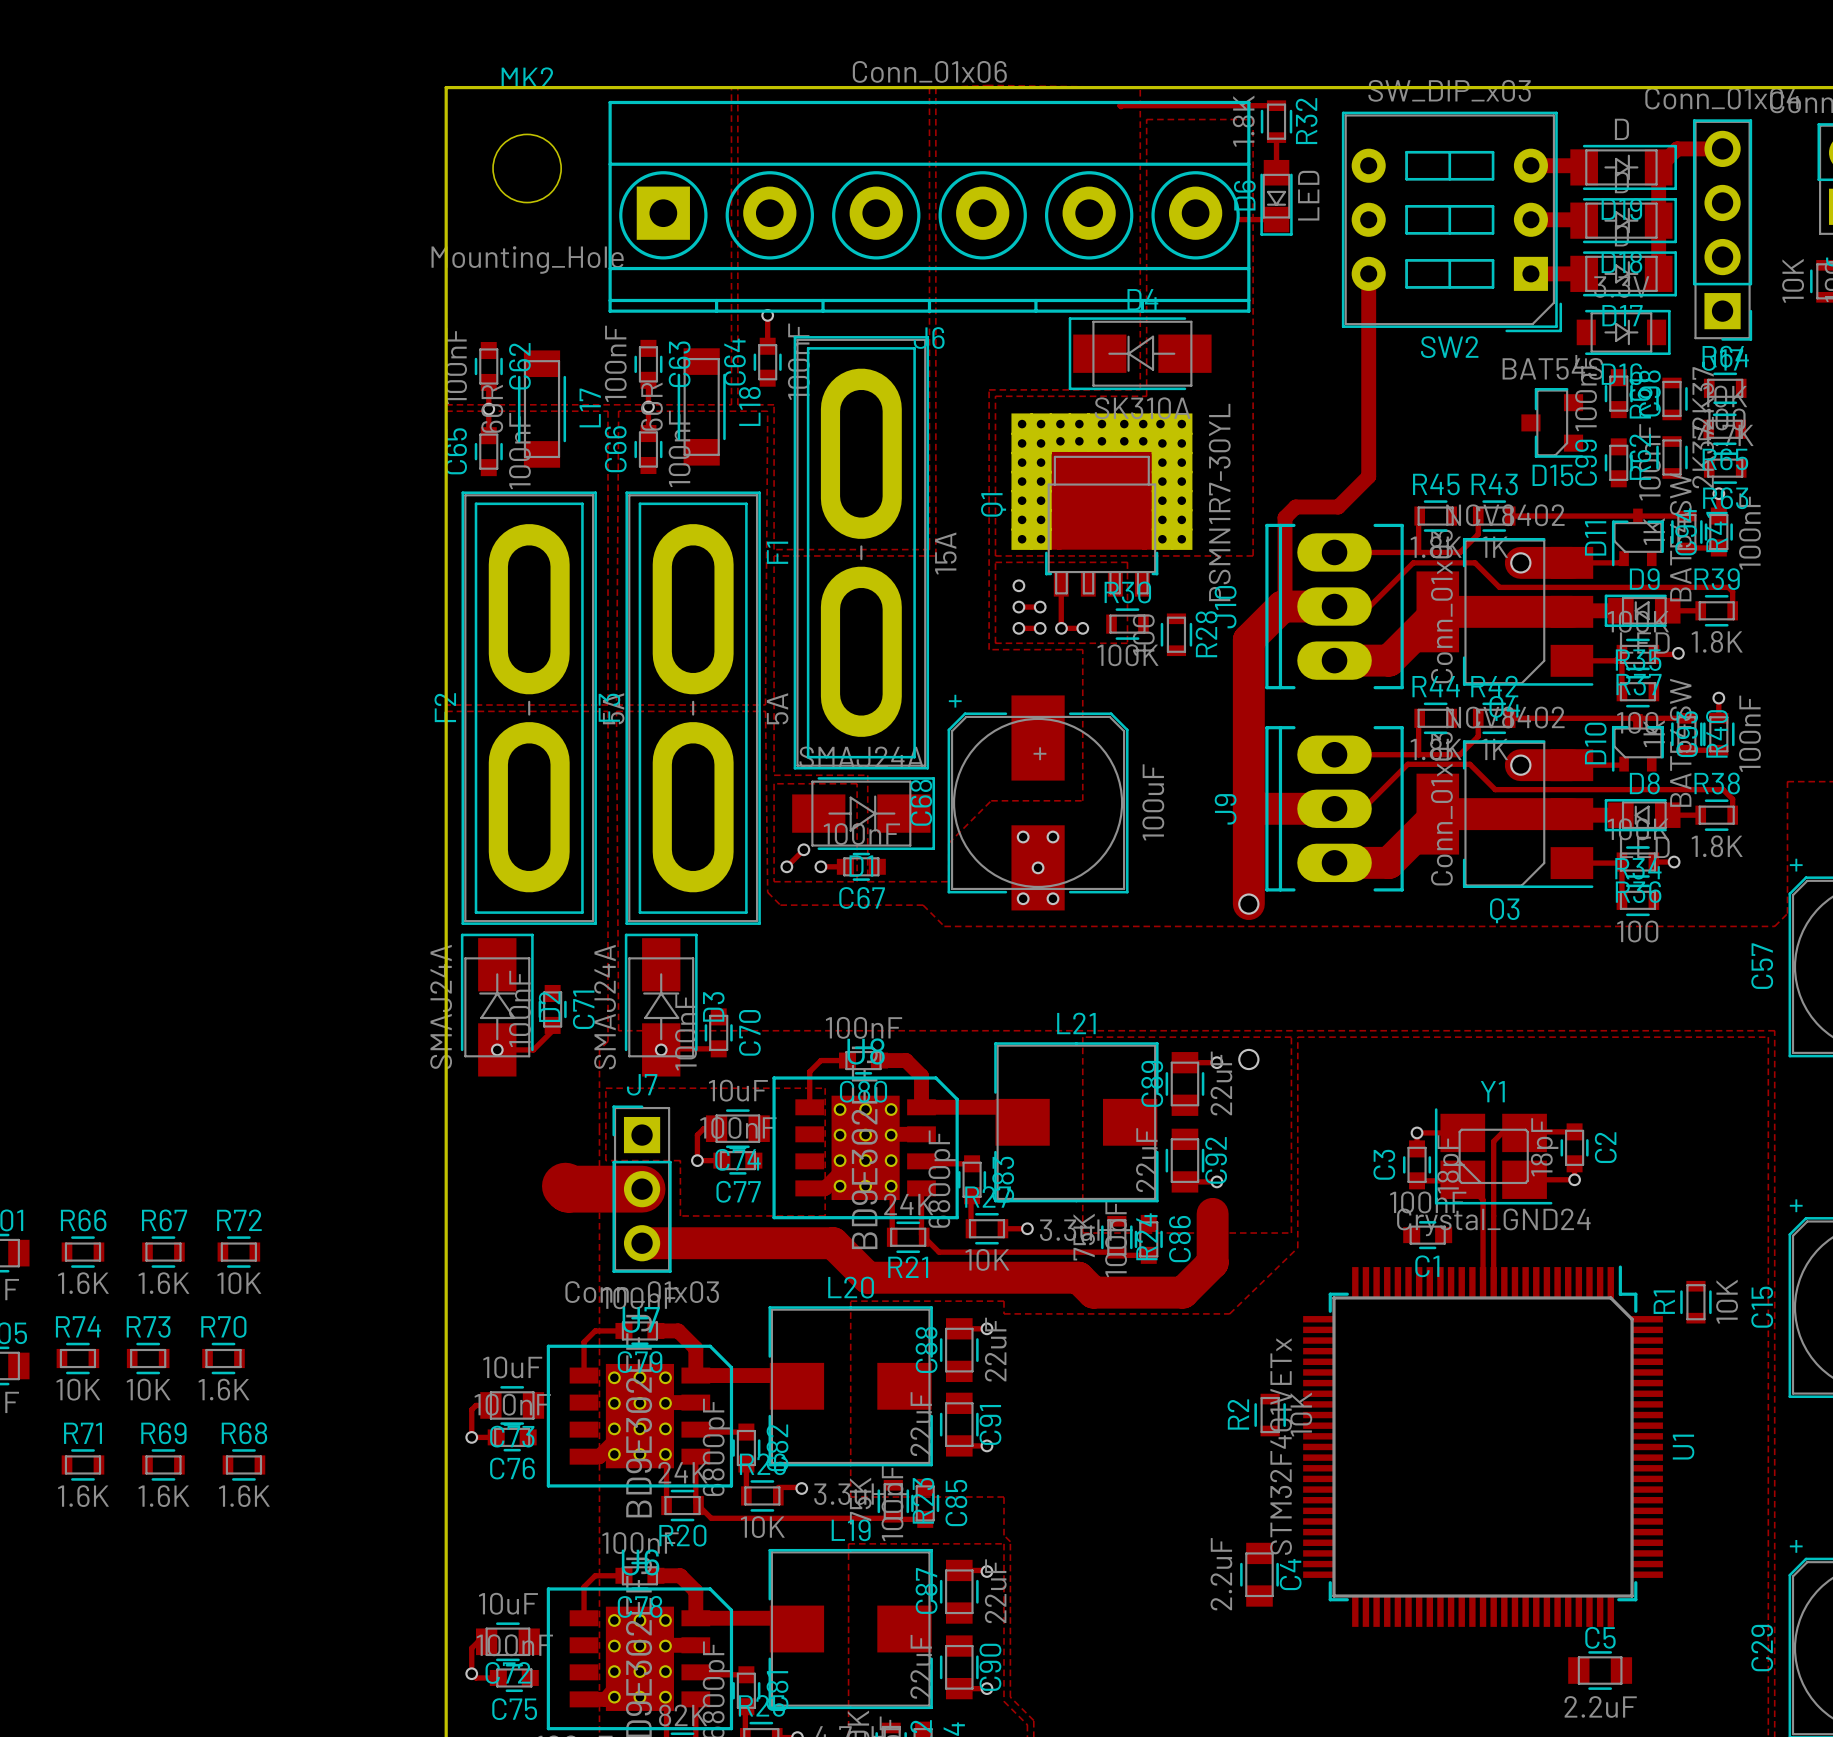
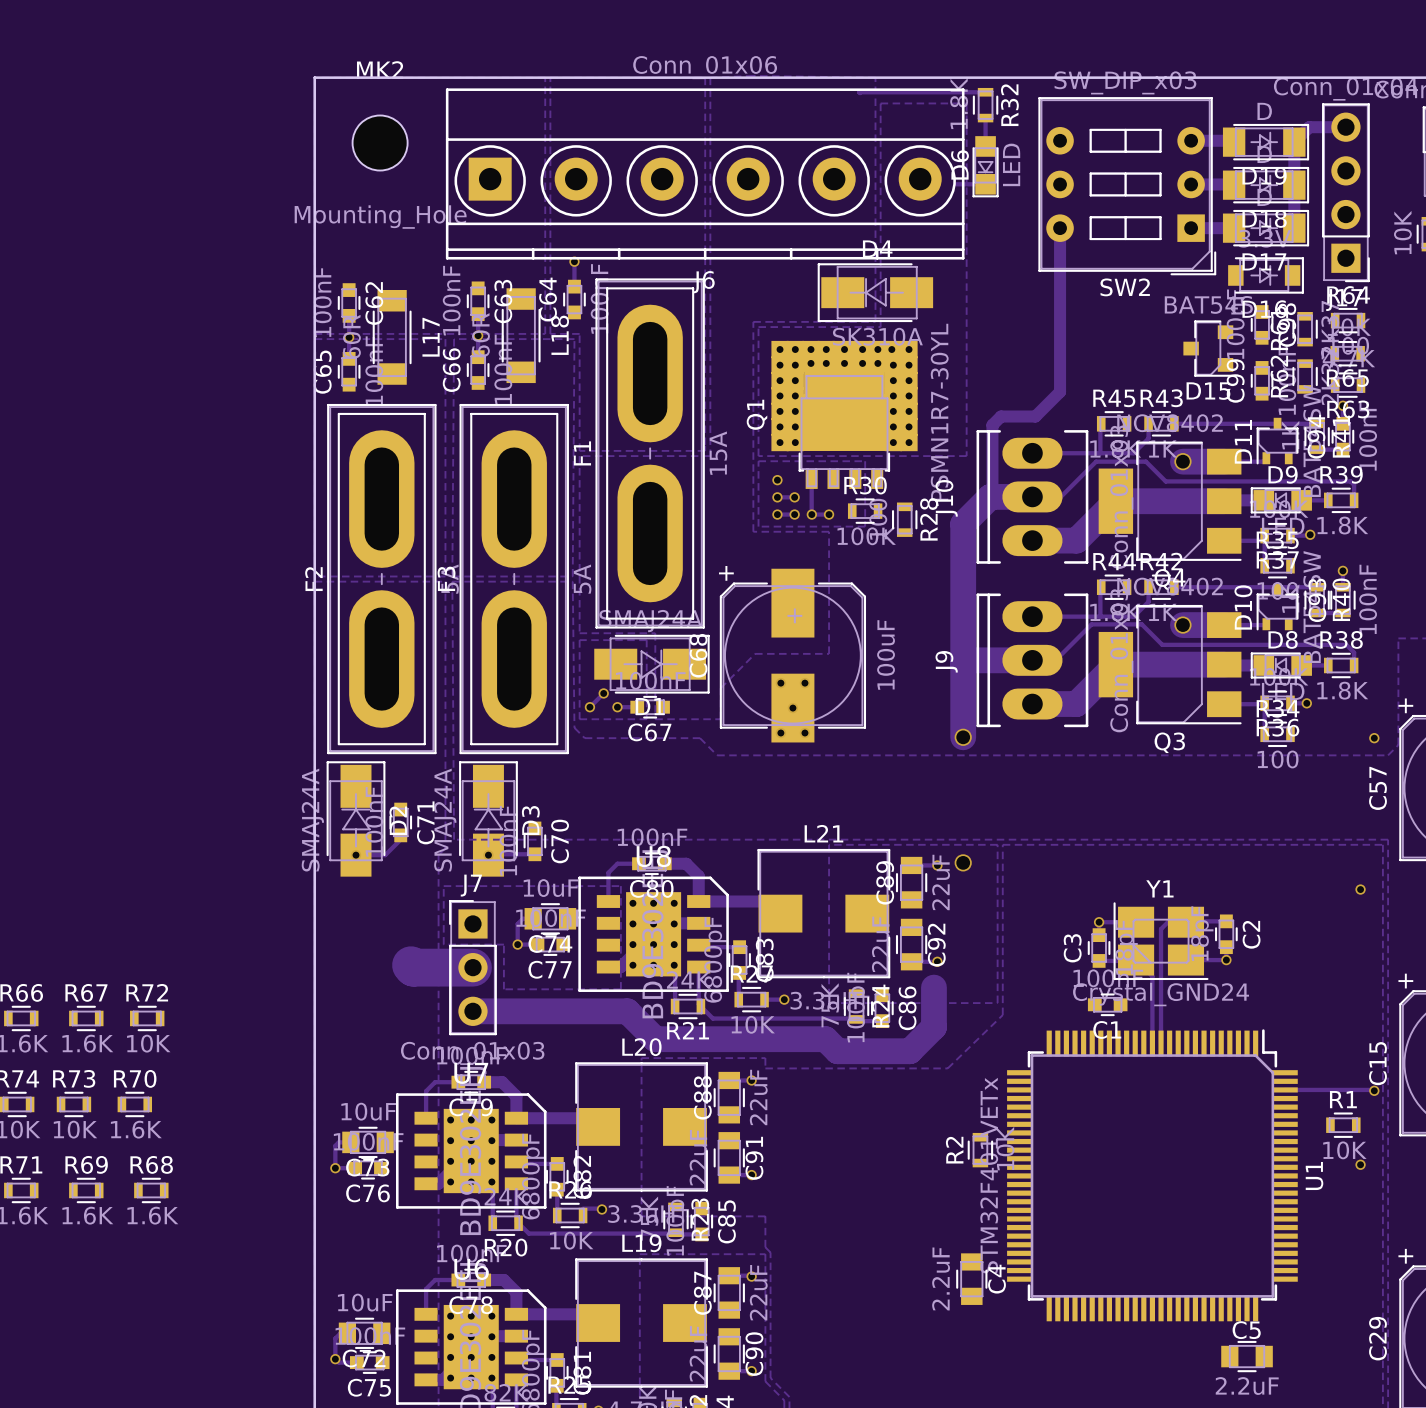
via: none -> (1374, 738)
via: none -> (1360, 889)
R1 rotation: 0° (1695, 1302) -> 90° clockwise (1343, 1125)
R1 position: (1695, 1302) -> (1343, 1125)
track: none -> (1284, 1089) (1374, 1090)
via: none -> (1374, 1090)
via: none -> (1360, 1164)

